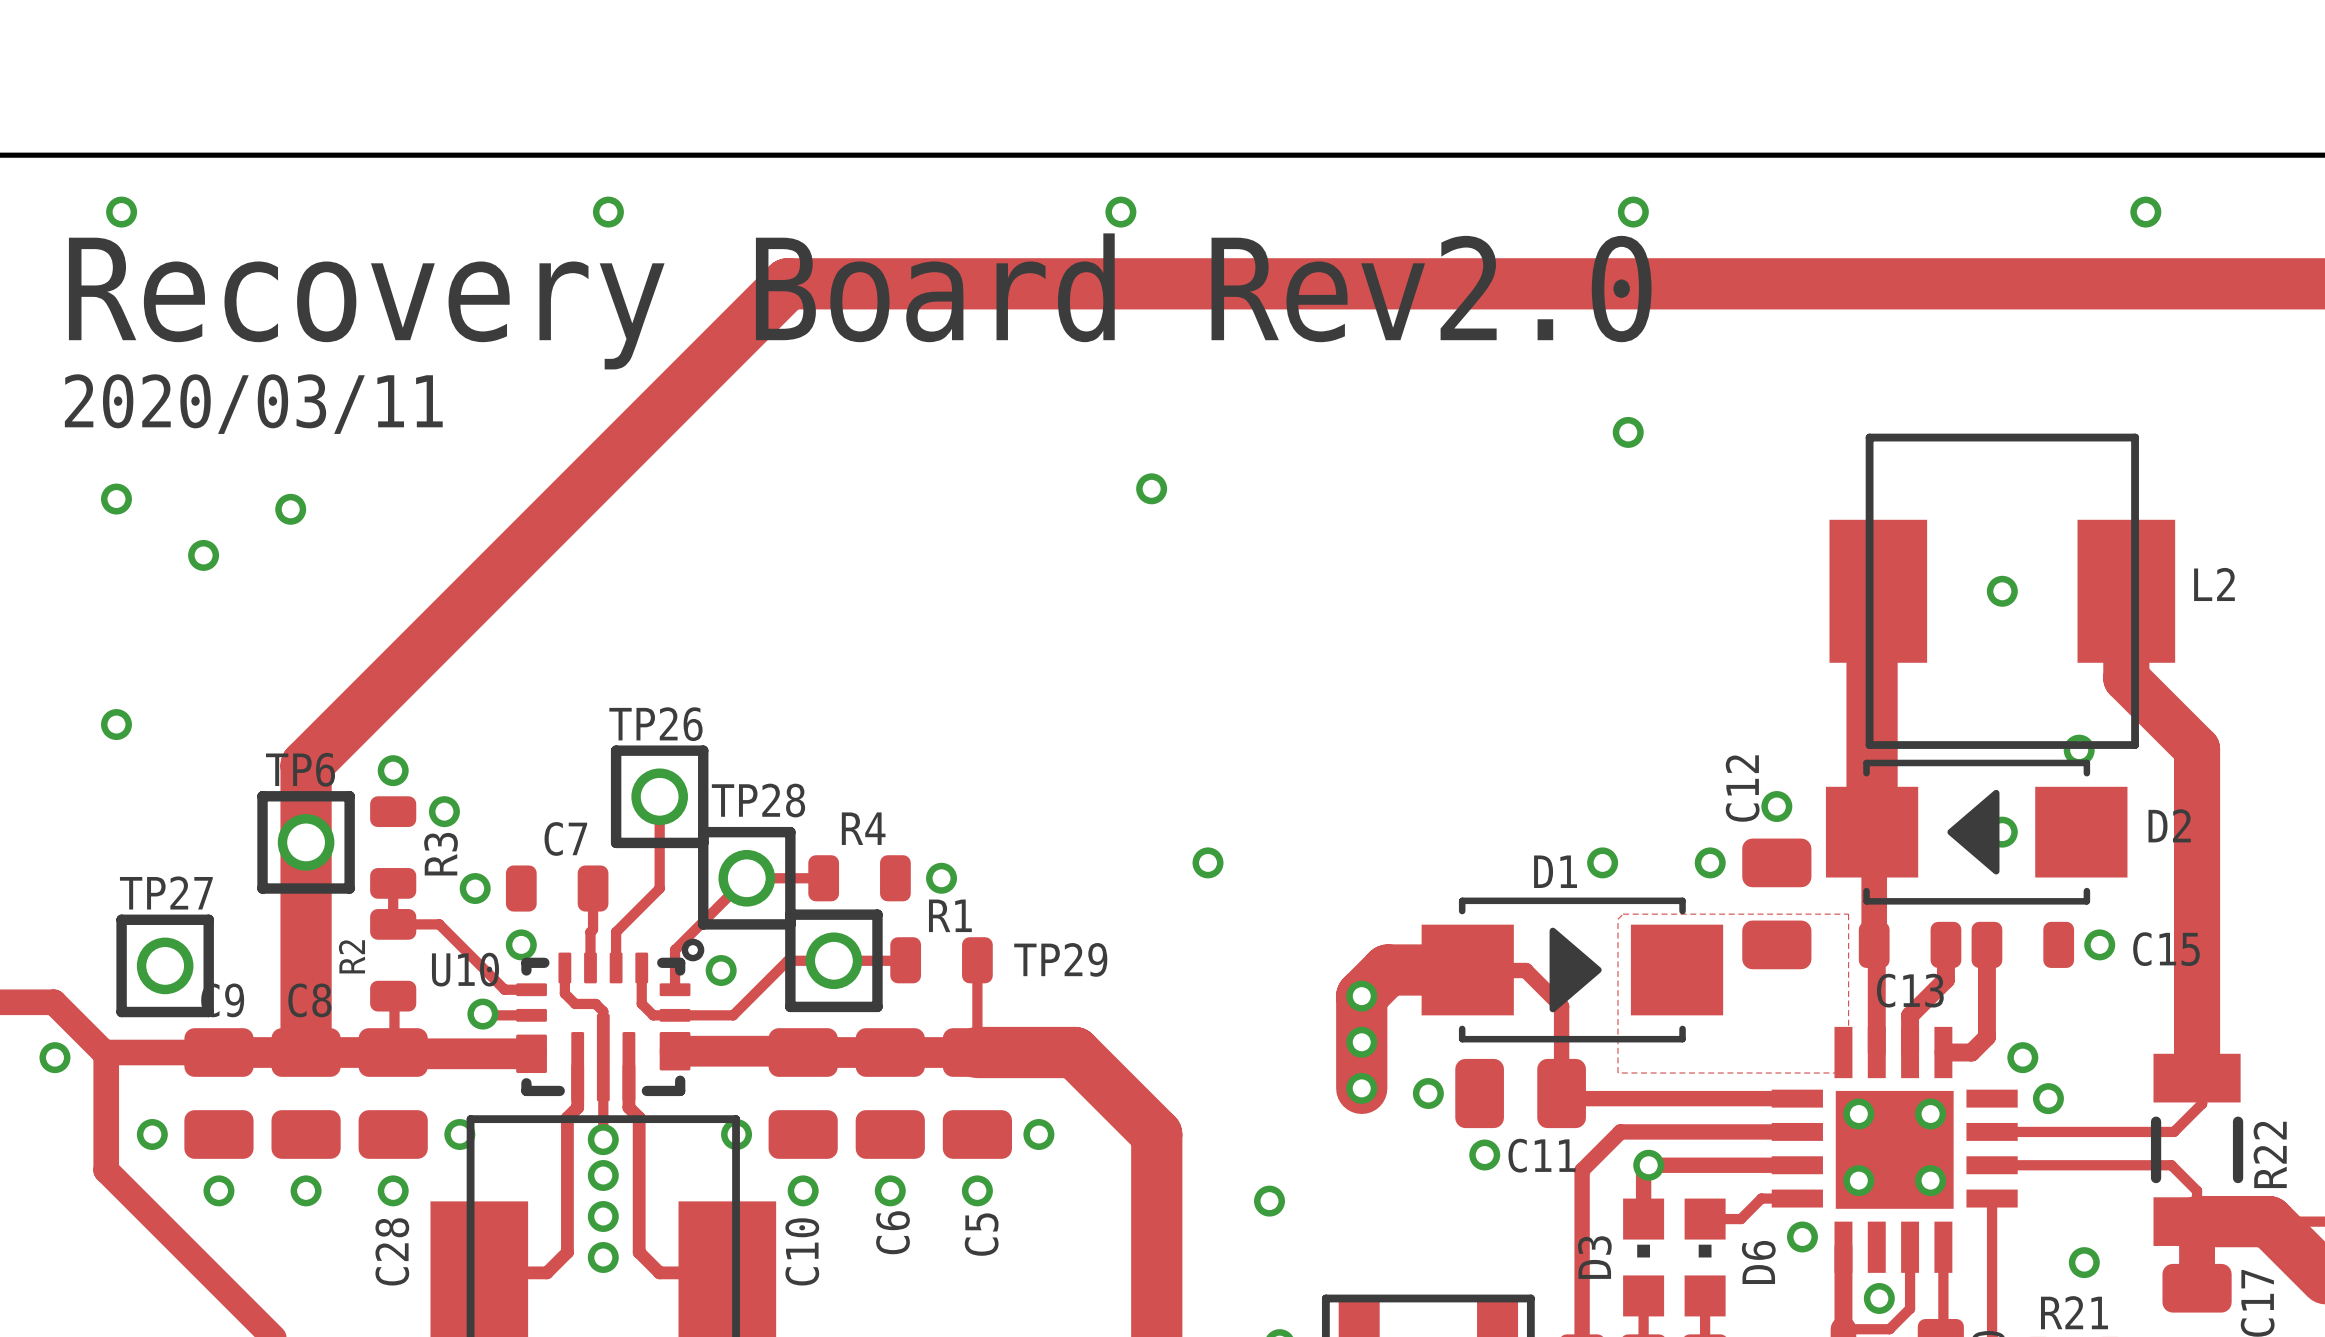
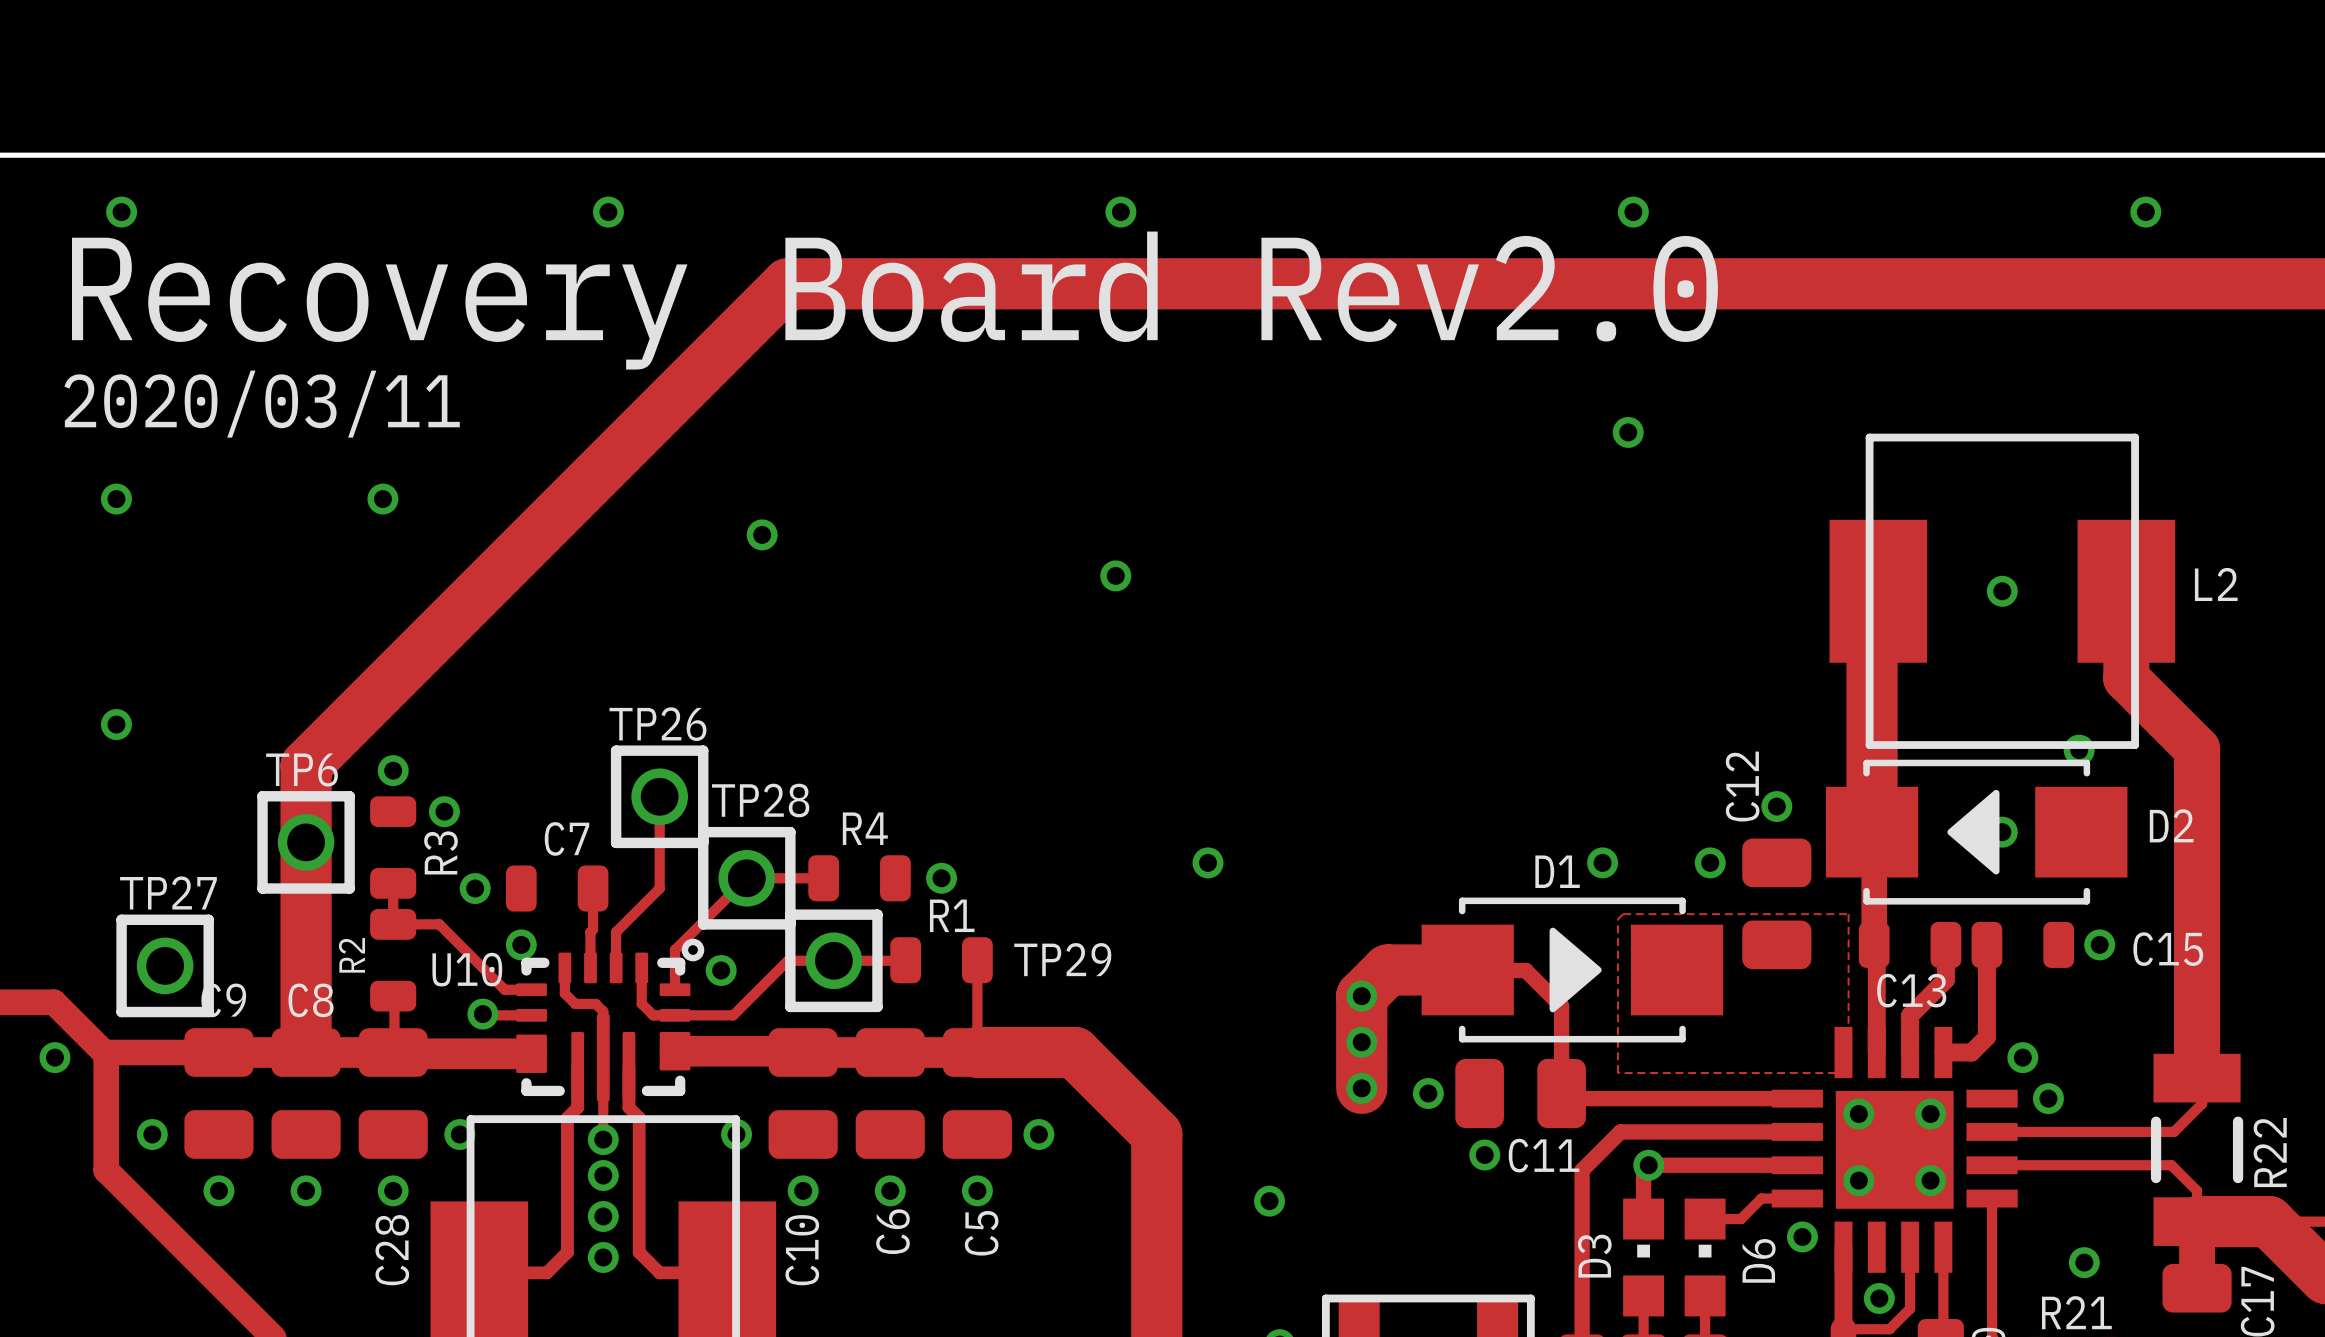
via position: (1151, 488) -> (1115, 575)
via position: (290, 509) -> (382, 499)
via: none -> (762, 534)
via: (203, 555) -> none

